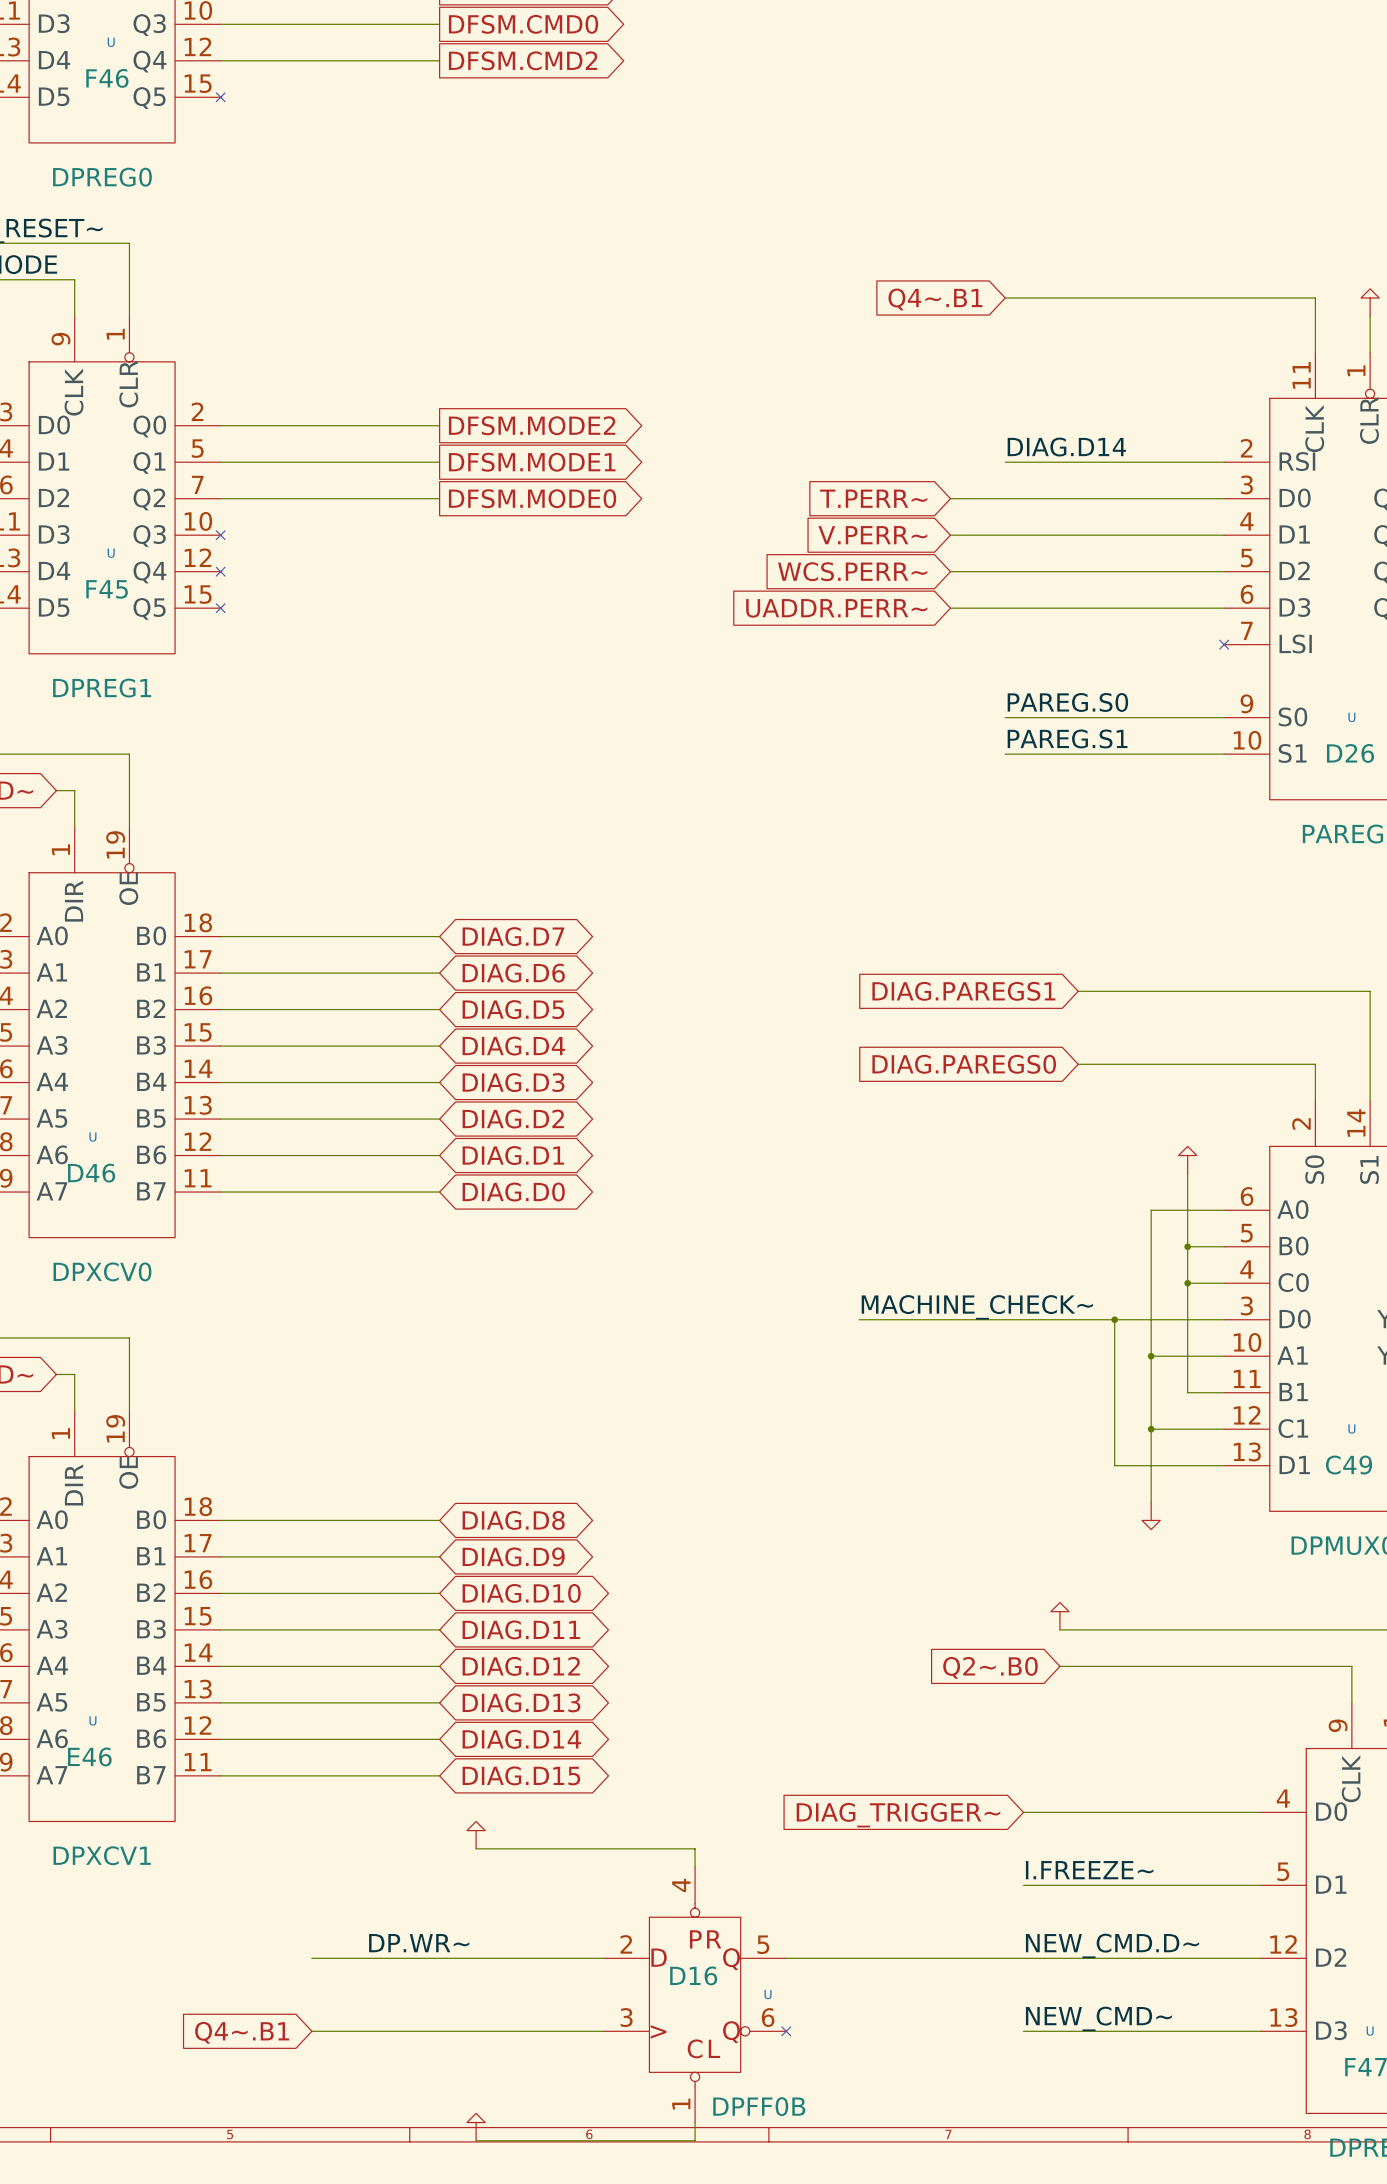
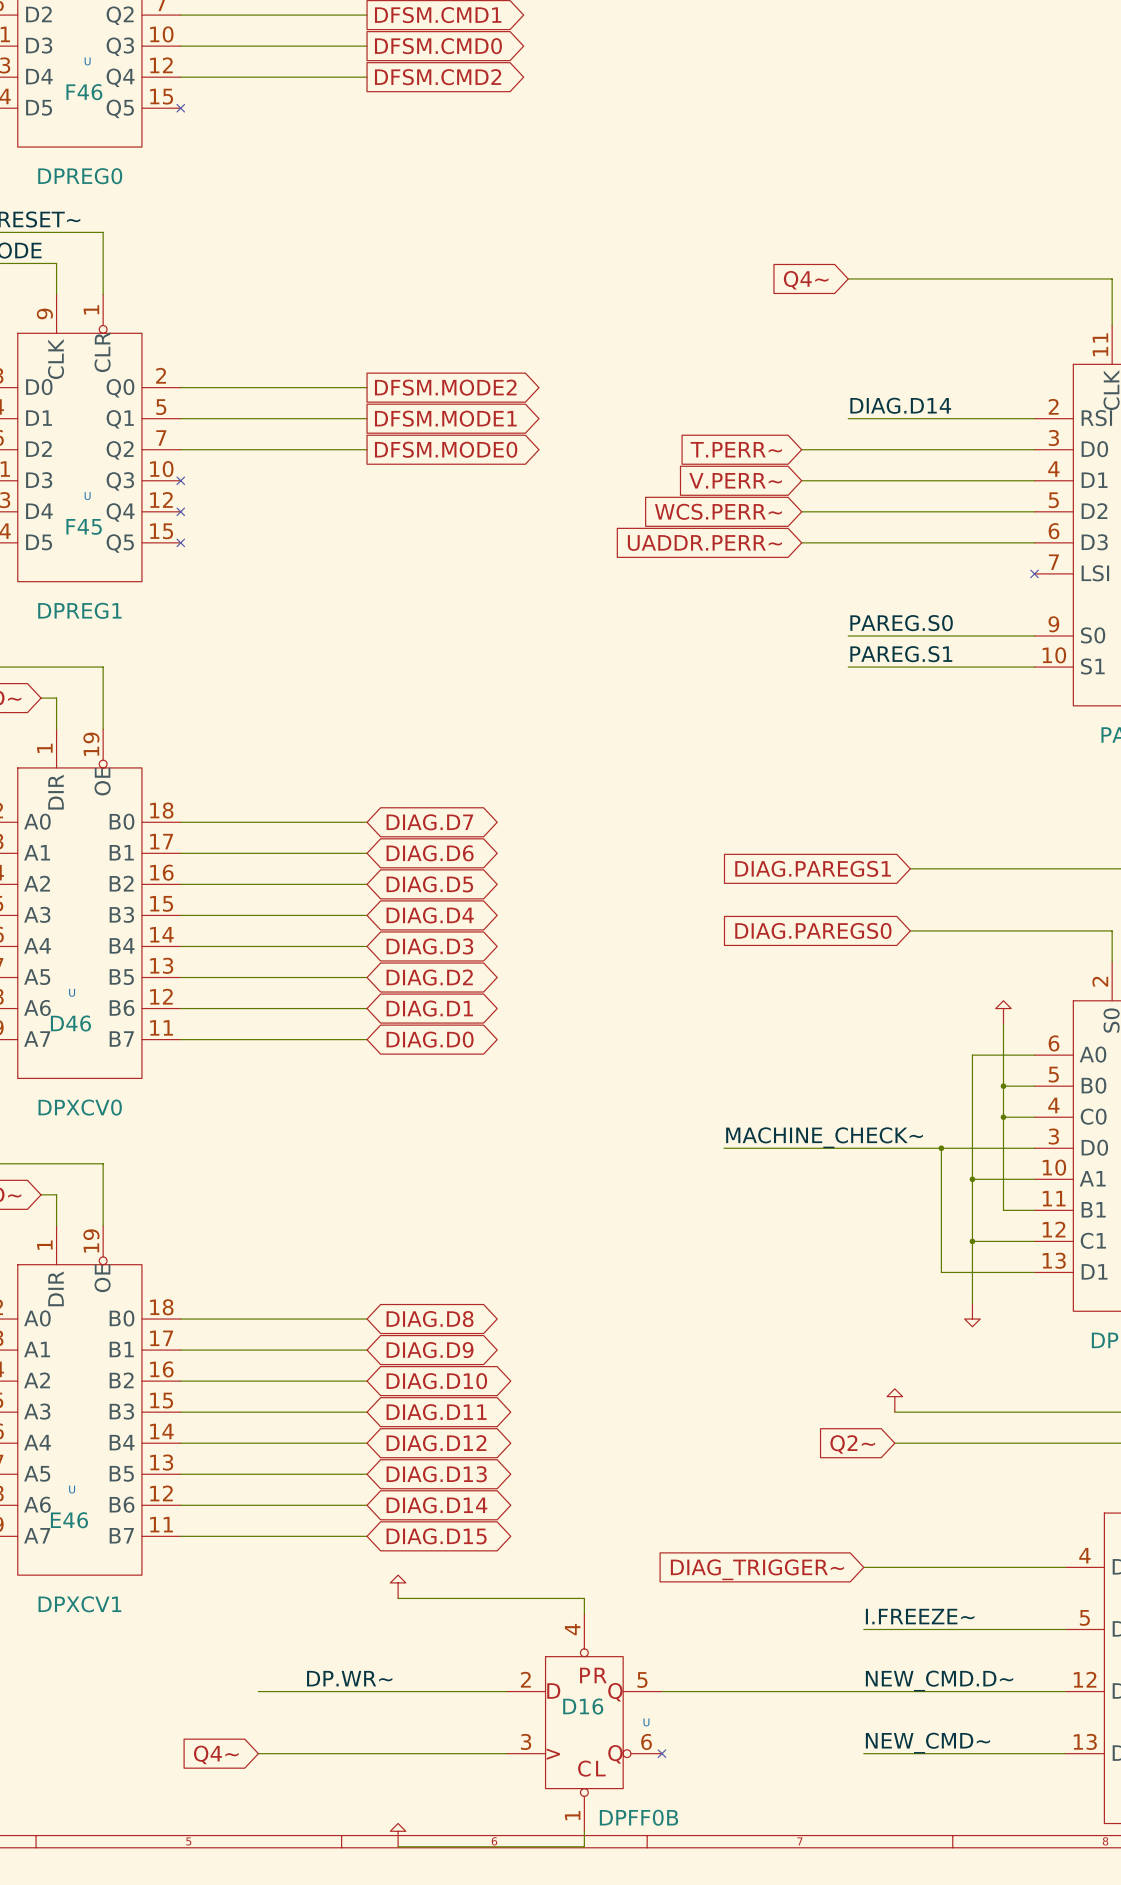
global label: Q4~.B1 (935, 299) -> Q4~ (806, 280)
global label: Q2~.B0 (990, 1667) -> Q2~ (852, 1444)
global label: Q4~.B1 (242, 2032) -> Q4~ (216, 1754)

